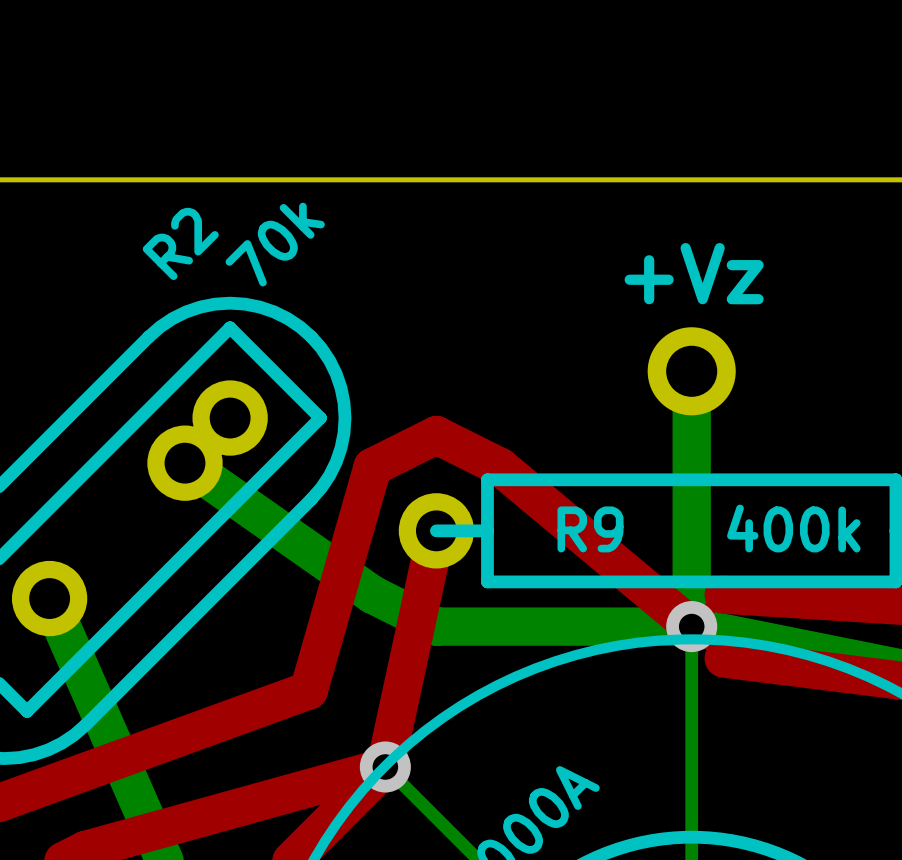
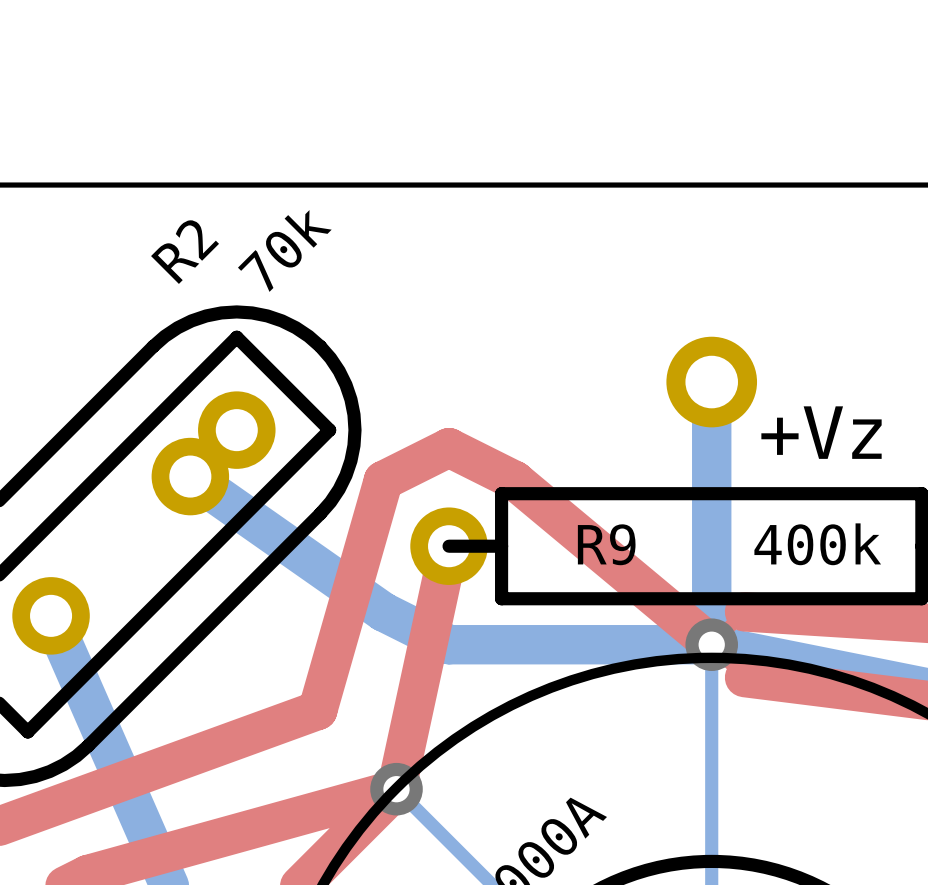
text position: +Vz (694, 273) -> +Vz (821, 432)

